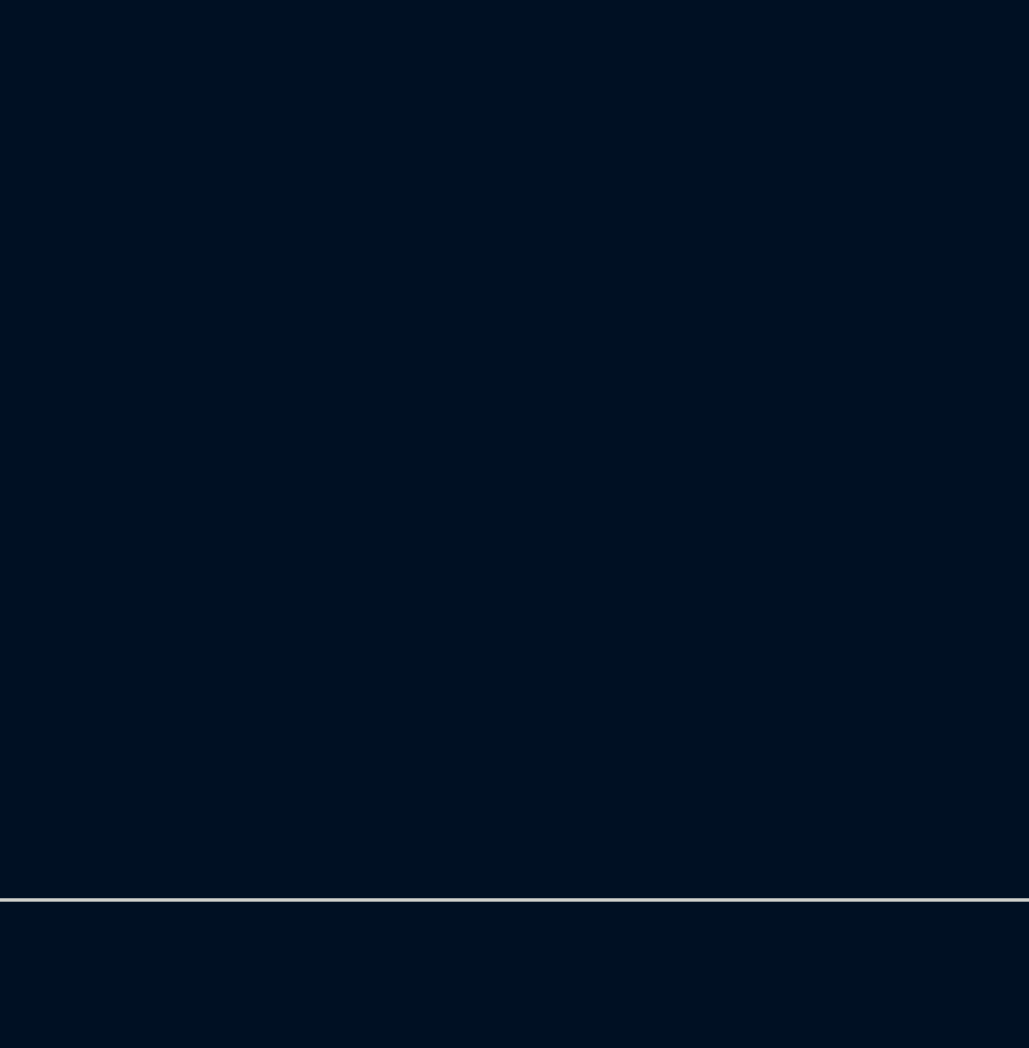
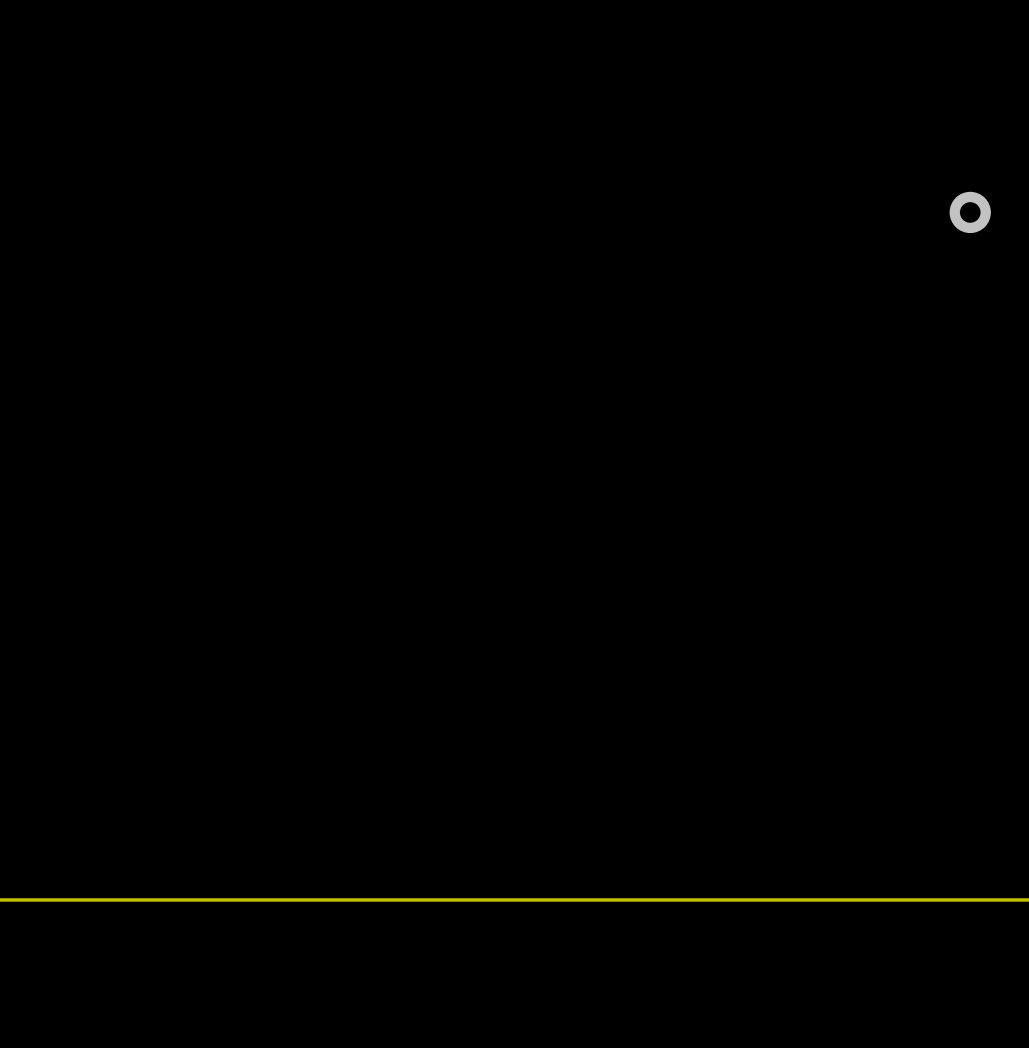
via: none -> (970, 212)

